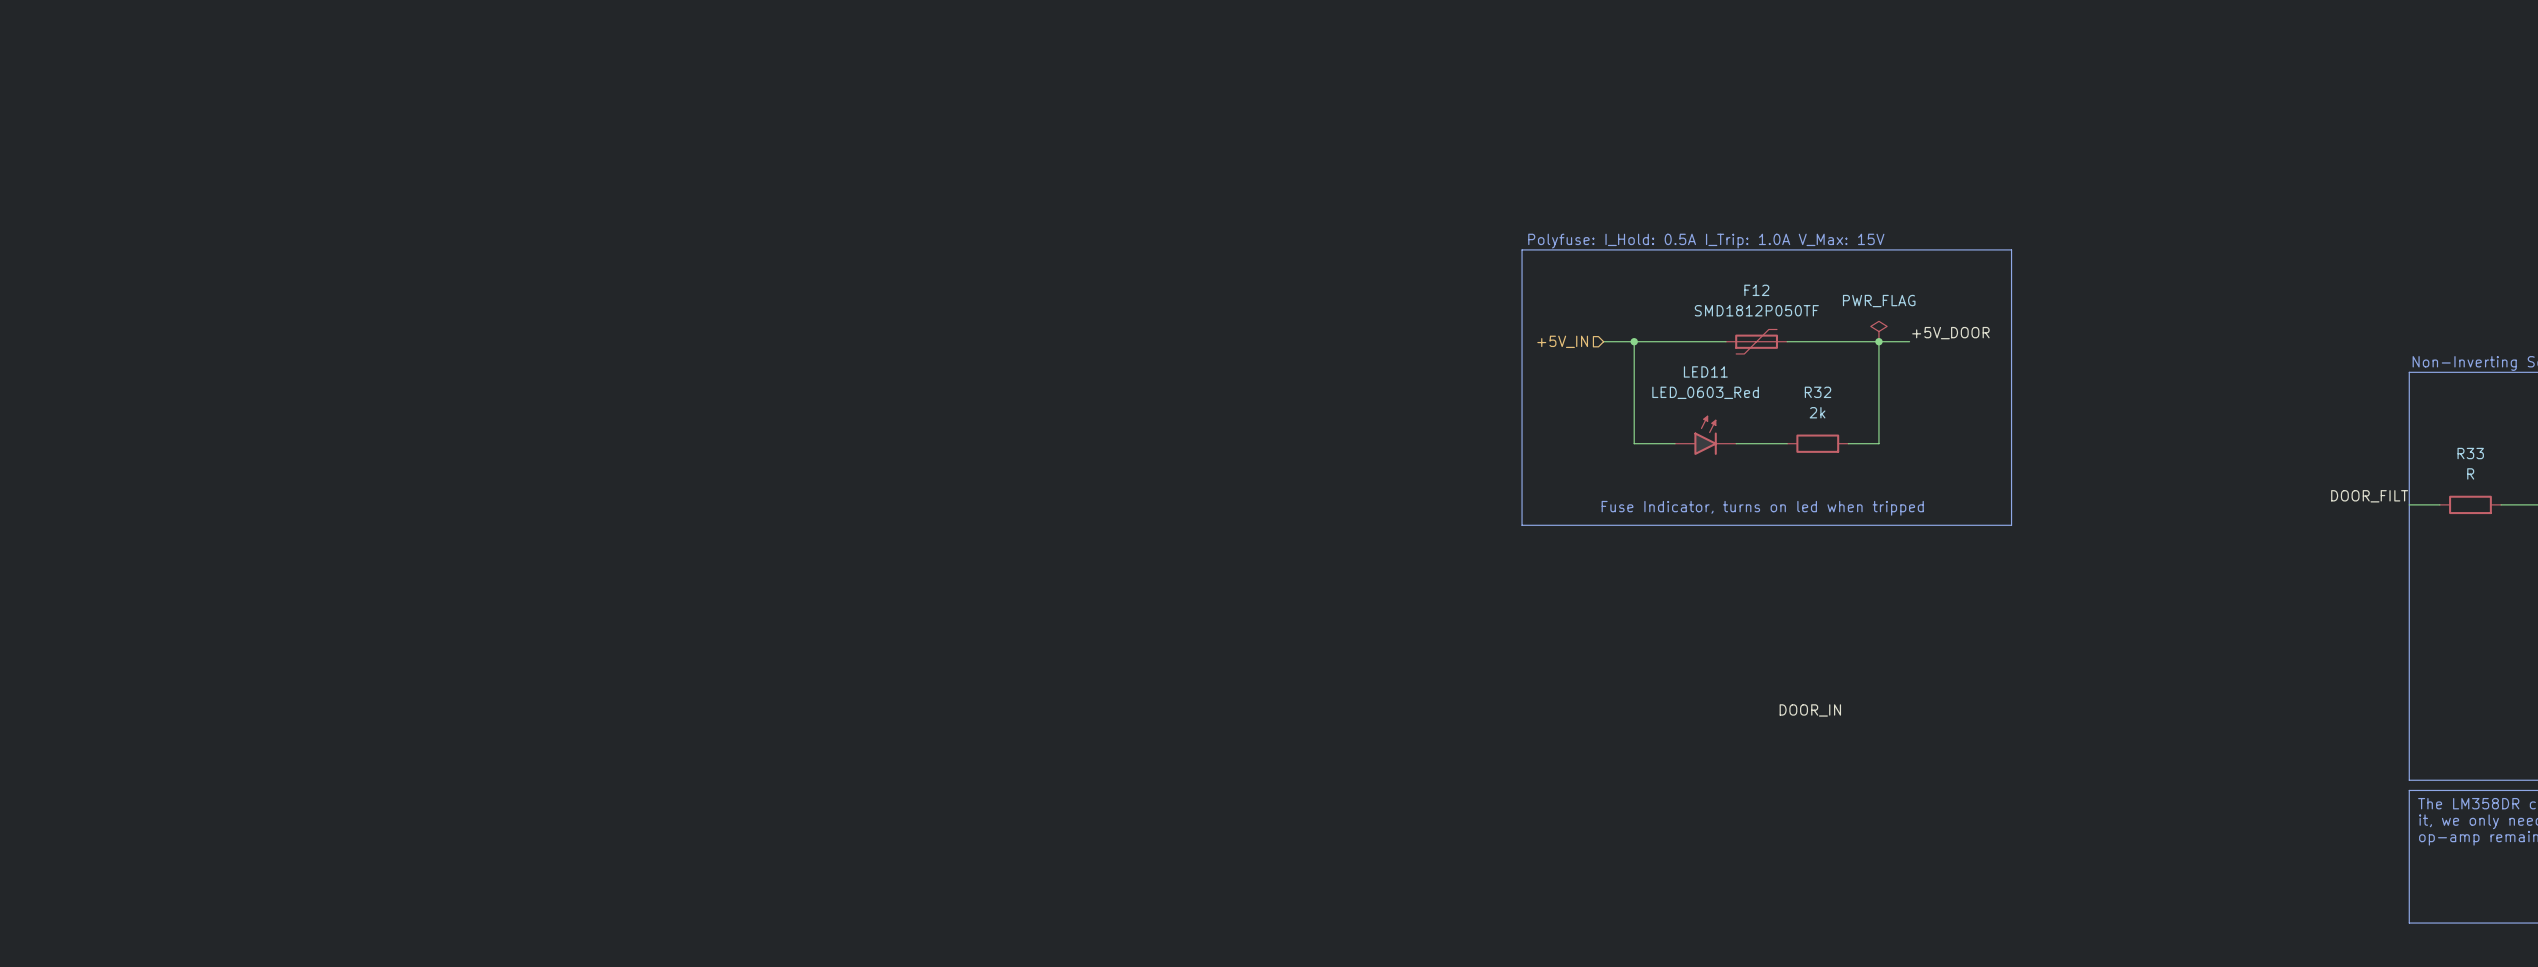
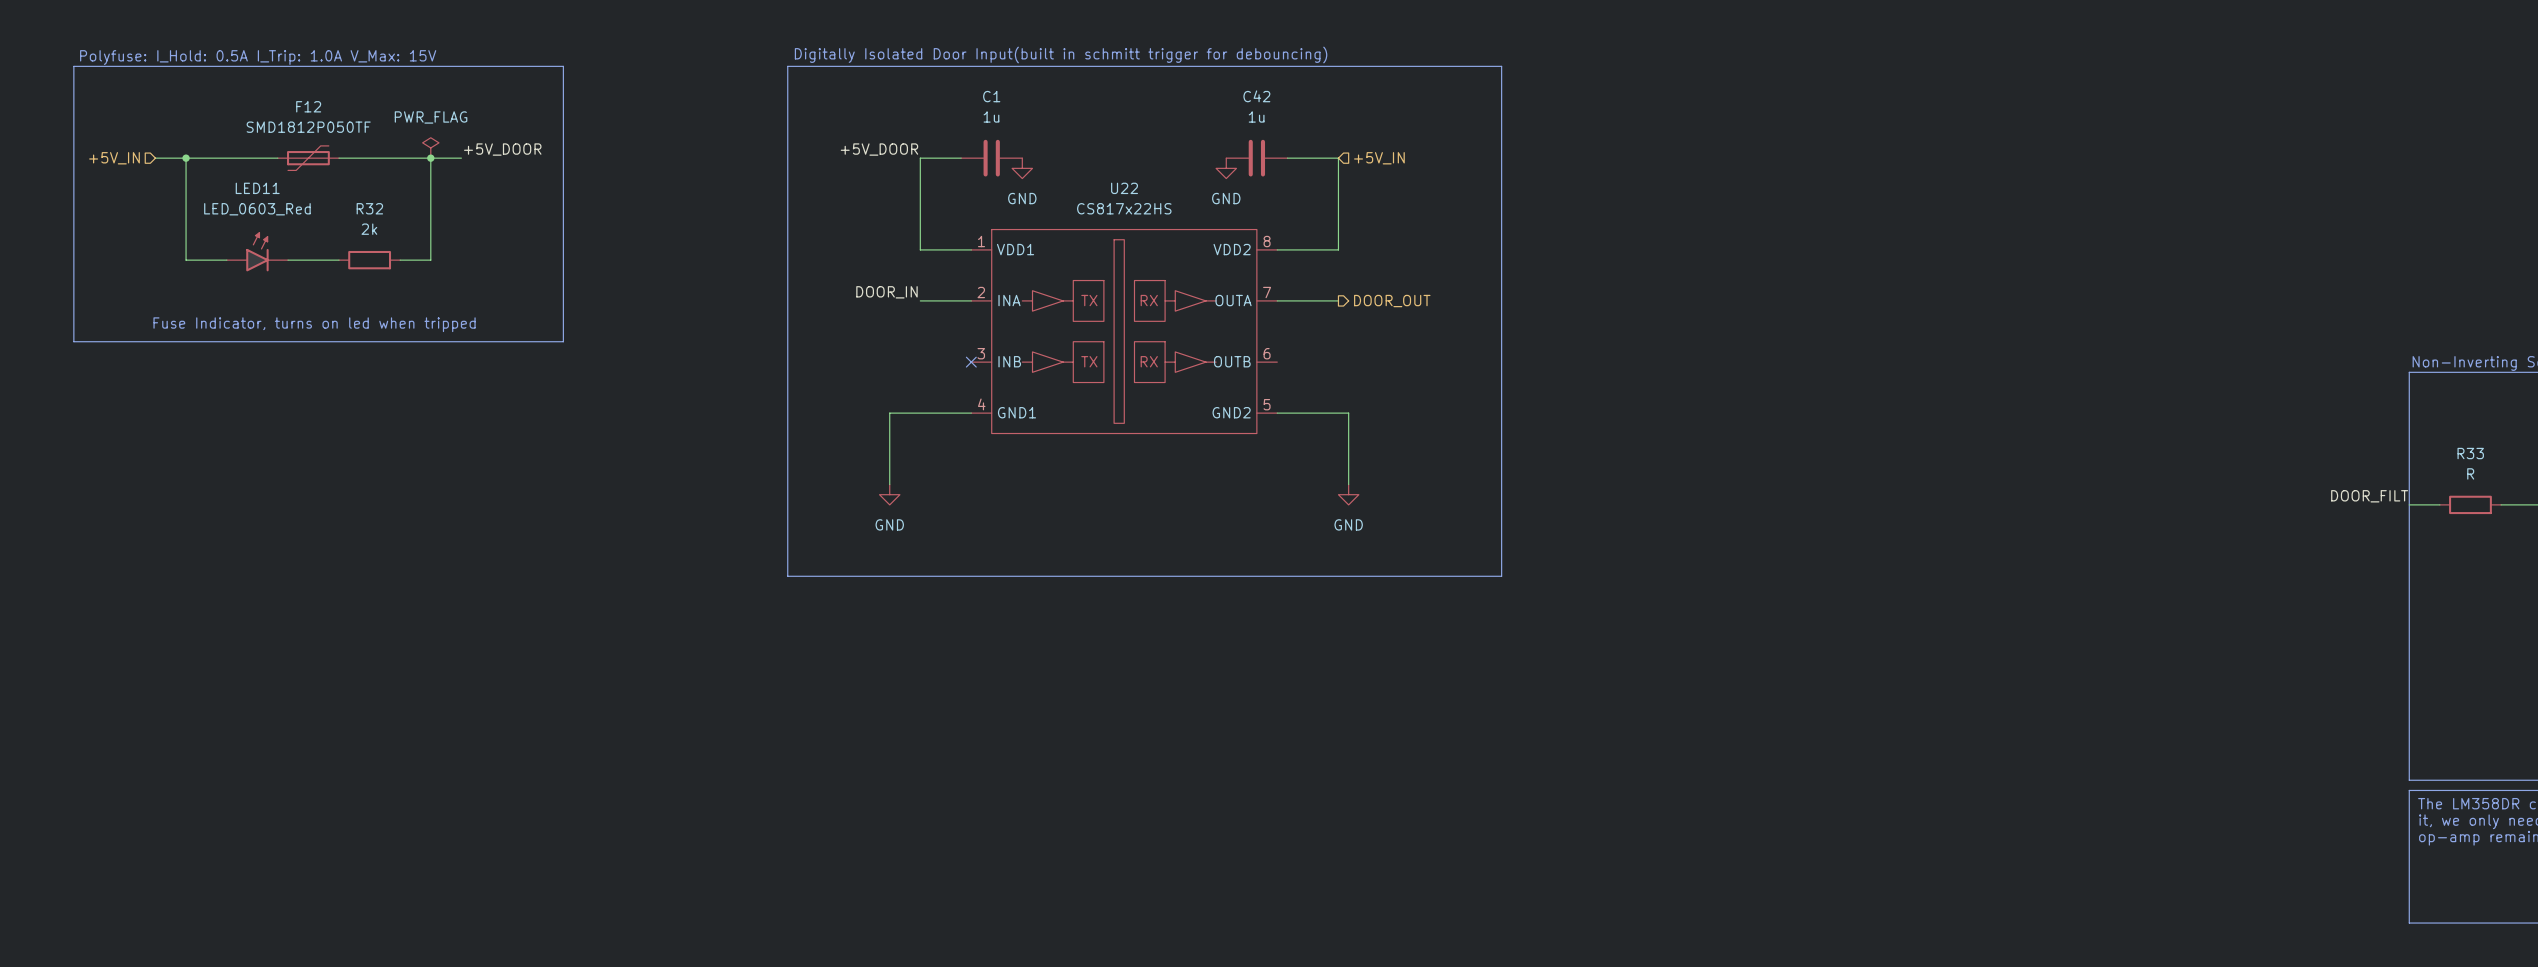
text: none -> Digitally Isolated Door Input(built in schmitt trigger for debouncing) (1061, 54)
text: none -> Polyfuse: I_Hold: 0.5A I_Trip: 1.0A V_Max: 15V (258, 57)
line: none -> (73, 66) (563, 66) (563, 341) (73, 341) (73, 66)
line: none -> (787, 66) (1501, 66) (1501, 576) (787, 576) (787, 66)
power symbol: none -> PWR_FLAG (430, 147)
label: none -> +5V_DOOR (502, 149)
label: none -> +5V_DOOR (879, 149)
hierarchical label: none -> +5V_IN (114, 158)
wire: none -> (155, 158) (277, 158)
wire: none -> (186, 158) (186, 260) (226, 260)
junction: none -> (186, 158)
wire: none -> (339, 158) (461, 158)
wire: none -> (430, 158) (430, 260) (400, 260)
junction: none -> (430, 158)
wire: none -> (961, 158) (920, 158) (920, 249) (971, 249)
C1: none -> 1u (991, 158)
C42: none -> 1u (1256, 158)
wire: none -> (1287, 158) (1338, 158) (1338, 249) (1277, 249)
hierarchical label: none -> +5V_IN (1379, 158)
power symbol: none -> GND (1022, 168)
power symbol: none -> GND (1226, 168)
text: Polyfuse: I_Hold: 0.5A I_Trip: 1.0A V_Max: 15V (1706, 241) -> none
line: (1522, 249) (2011, 249) (2011, 525) (1522, 525) (1522, 249) -> none
wire: none -> (288, 260) (339, 260)
label: none -> DOOR_IN (886, 292)
wire: none -> (920, 300) (971, 300)
wire: none -> (1277, 300) (1338, 300)
hierarchical label: none -> DOOR_OUT (1392, 301)
text: none -> Fuse Indicator, turns on led when tripped (314, 324)
U22: none -> CS817x22HS (1124, 331)
power symbol: PWR_FLAG (1878, 331) -> none
label: +5V_DOOR (1950, 333) -> none
hierarchical label: +5V_IN (1562, 341) -> none
wire: (1603, 341) (1725, 341) -> none
wire: (1634, 341) (1634, 443) (1675, 443) -> none
junction: (1634, 341) -> none
F12 position: (1756, 341) -> (308, 158)
wire: (1787, 341) (1909, 341) -> none
wire: (1878, 341) (1878, 443) (1848, 443) -> none
junction: (1878, 341) -> none
no-connect mark: none -> (971, 362)
wire: none -> (971, 413) (889, 413) (889, 484)
wire: none -> (1277, 413) (1348, 413) (1348, 484)
LED11 position: (1705, 435) -> (257, 251)
wire: (1736, 443) (1787, 443) -> none
R32 position: (1817, 443) -> (369, 260)
power symbol: none -> GND (889, 494)
power symbol: none -> GND (1348, 494)
text: Fuse Indicator, turns on led when tripped (1762, 508) -> none
label: DOOR_IN (1810, 710) -> none

